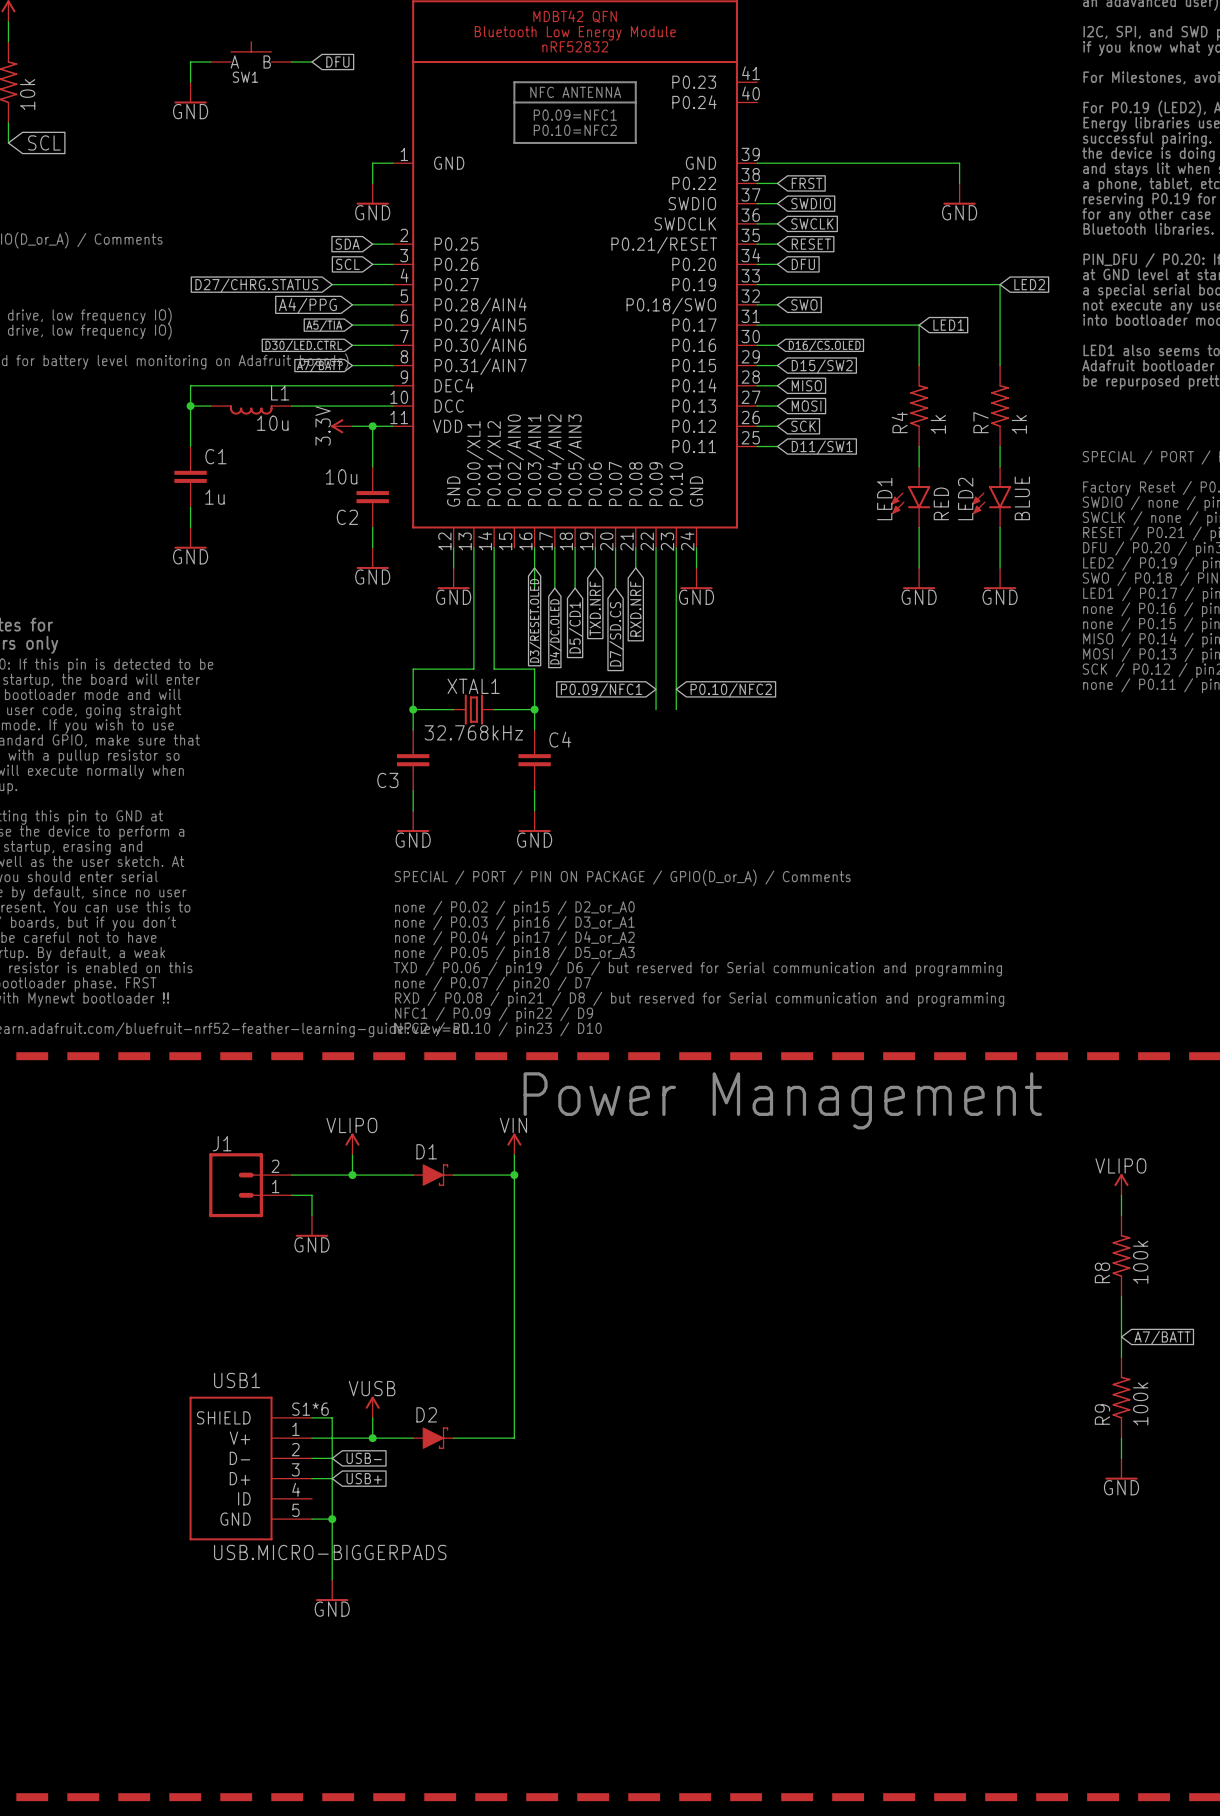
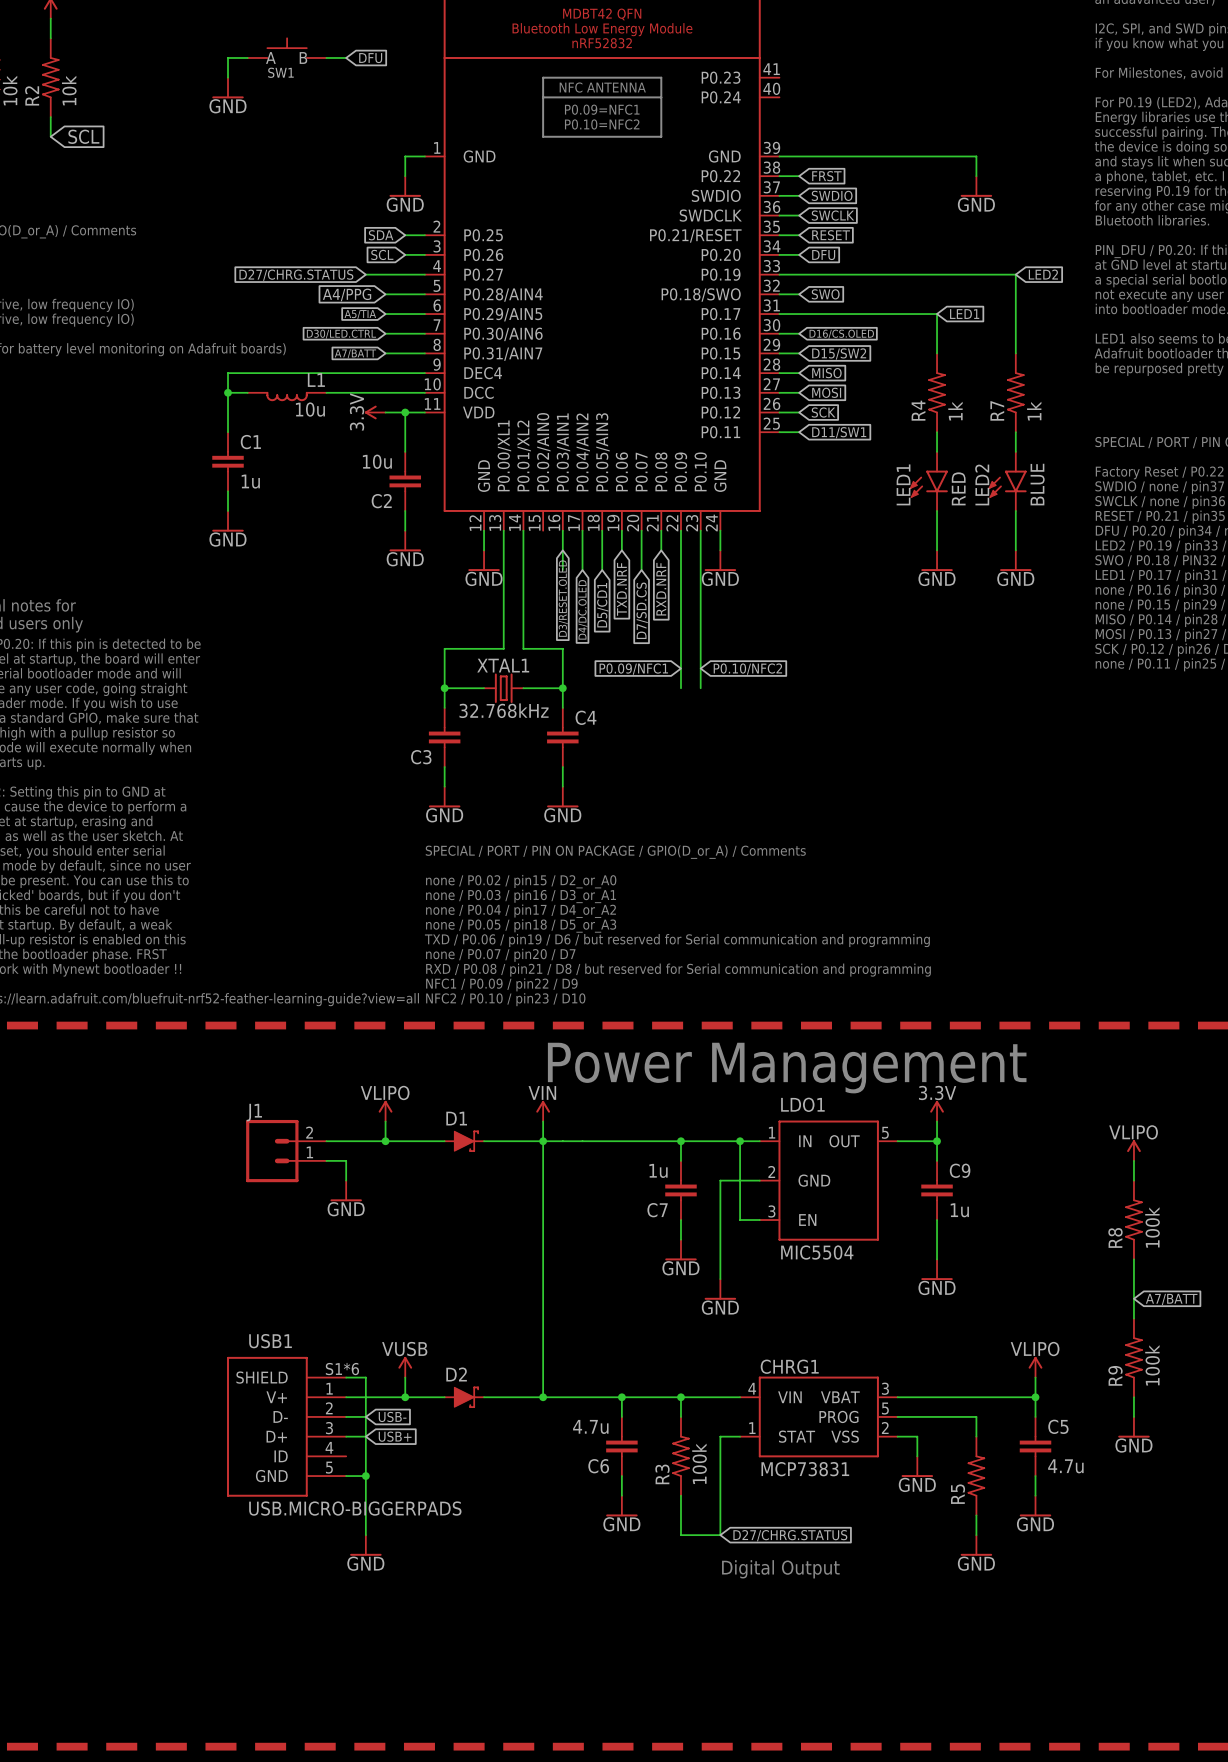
power symbol: none -> 3.3V (937, 1111)
wire: none -> (937, 1121) (937, 1160)
wire: none -> (543, 1141) (759, 1141)
wire: none -> (680, 1141) (680, 1160)
junction: none -> (680, 1141)
wire: none -> (740, 1141) (740, 1220) (759, 1220)
junction: none -> (740, 1141)
wire: none -> (897, 1141) (937, 1141)
junction: none -> (937, 1141)
wire: none -> (759, 1180) (720, 1180) (720, 1279)
LDO1: none -> MIC5504 (828, 1180)
C7: none -> 1u (680, 1190)
C9: none -> 1u (937, 1190)
wire: none -> (680, 1220) (680, 1239)
wire: none -> (937, 1220) (937, 1259)
power symbol: none -> GND (680, 1250)
power symbol: none -> GND (937, 1269)
power symbol: none -> GND (720, 1289)
power symbol: none -> VLIPO (1035, 1367)
wire: none -> (1035, 1377) (1035, 1416)
wire: none -> (543, 1397) (740, 1397)
junction: none -> (543, 1397)
wire: none -> (621, 1397) (621, 1416)
junction: none -> (621, 1397)
wire: none -> (680, 1397) (680, 1416)
junction: none -> (680, 1397)
wire: none -> (897, 1397) (1035, 1397)
junction: none -> (1035, 1397)
CHRG1: none -> MCP73831 (818, 1416)
wire: none -> (897, 1416) (976, 1416) (976, 1436)
wire: none -> (740, 1436) (720, 1436) (720, 1535) (680, 1535) (680, 1495)
wire: none -> (897, 1436) (917, 1436) (917, 1456)
C6: none -> 4.7u (621, 1446)
C5: none -> 4.7u (1035, 1446)
R3: none -> 100k (680, 1456)
power symbol: none -> GND (917, 1466)
wire: none -> (621, 1476) (621, 1495)
R5: none -> (976, 1476)
wire: none -> (1035, 1476) (1035, 1495)
power symbol: none -> GND (621, 1506)
power symbol: none -> GND (1035, 1506)
wire: none -> (976, 1515) (976, 1535)
global label: none -> D27/CHRG.STATUS (790, 1535)
power symbol: none -> GND (976, 1545)
text: none -> Digital Output (780, 1569)

